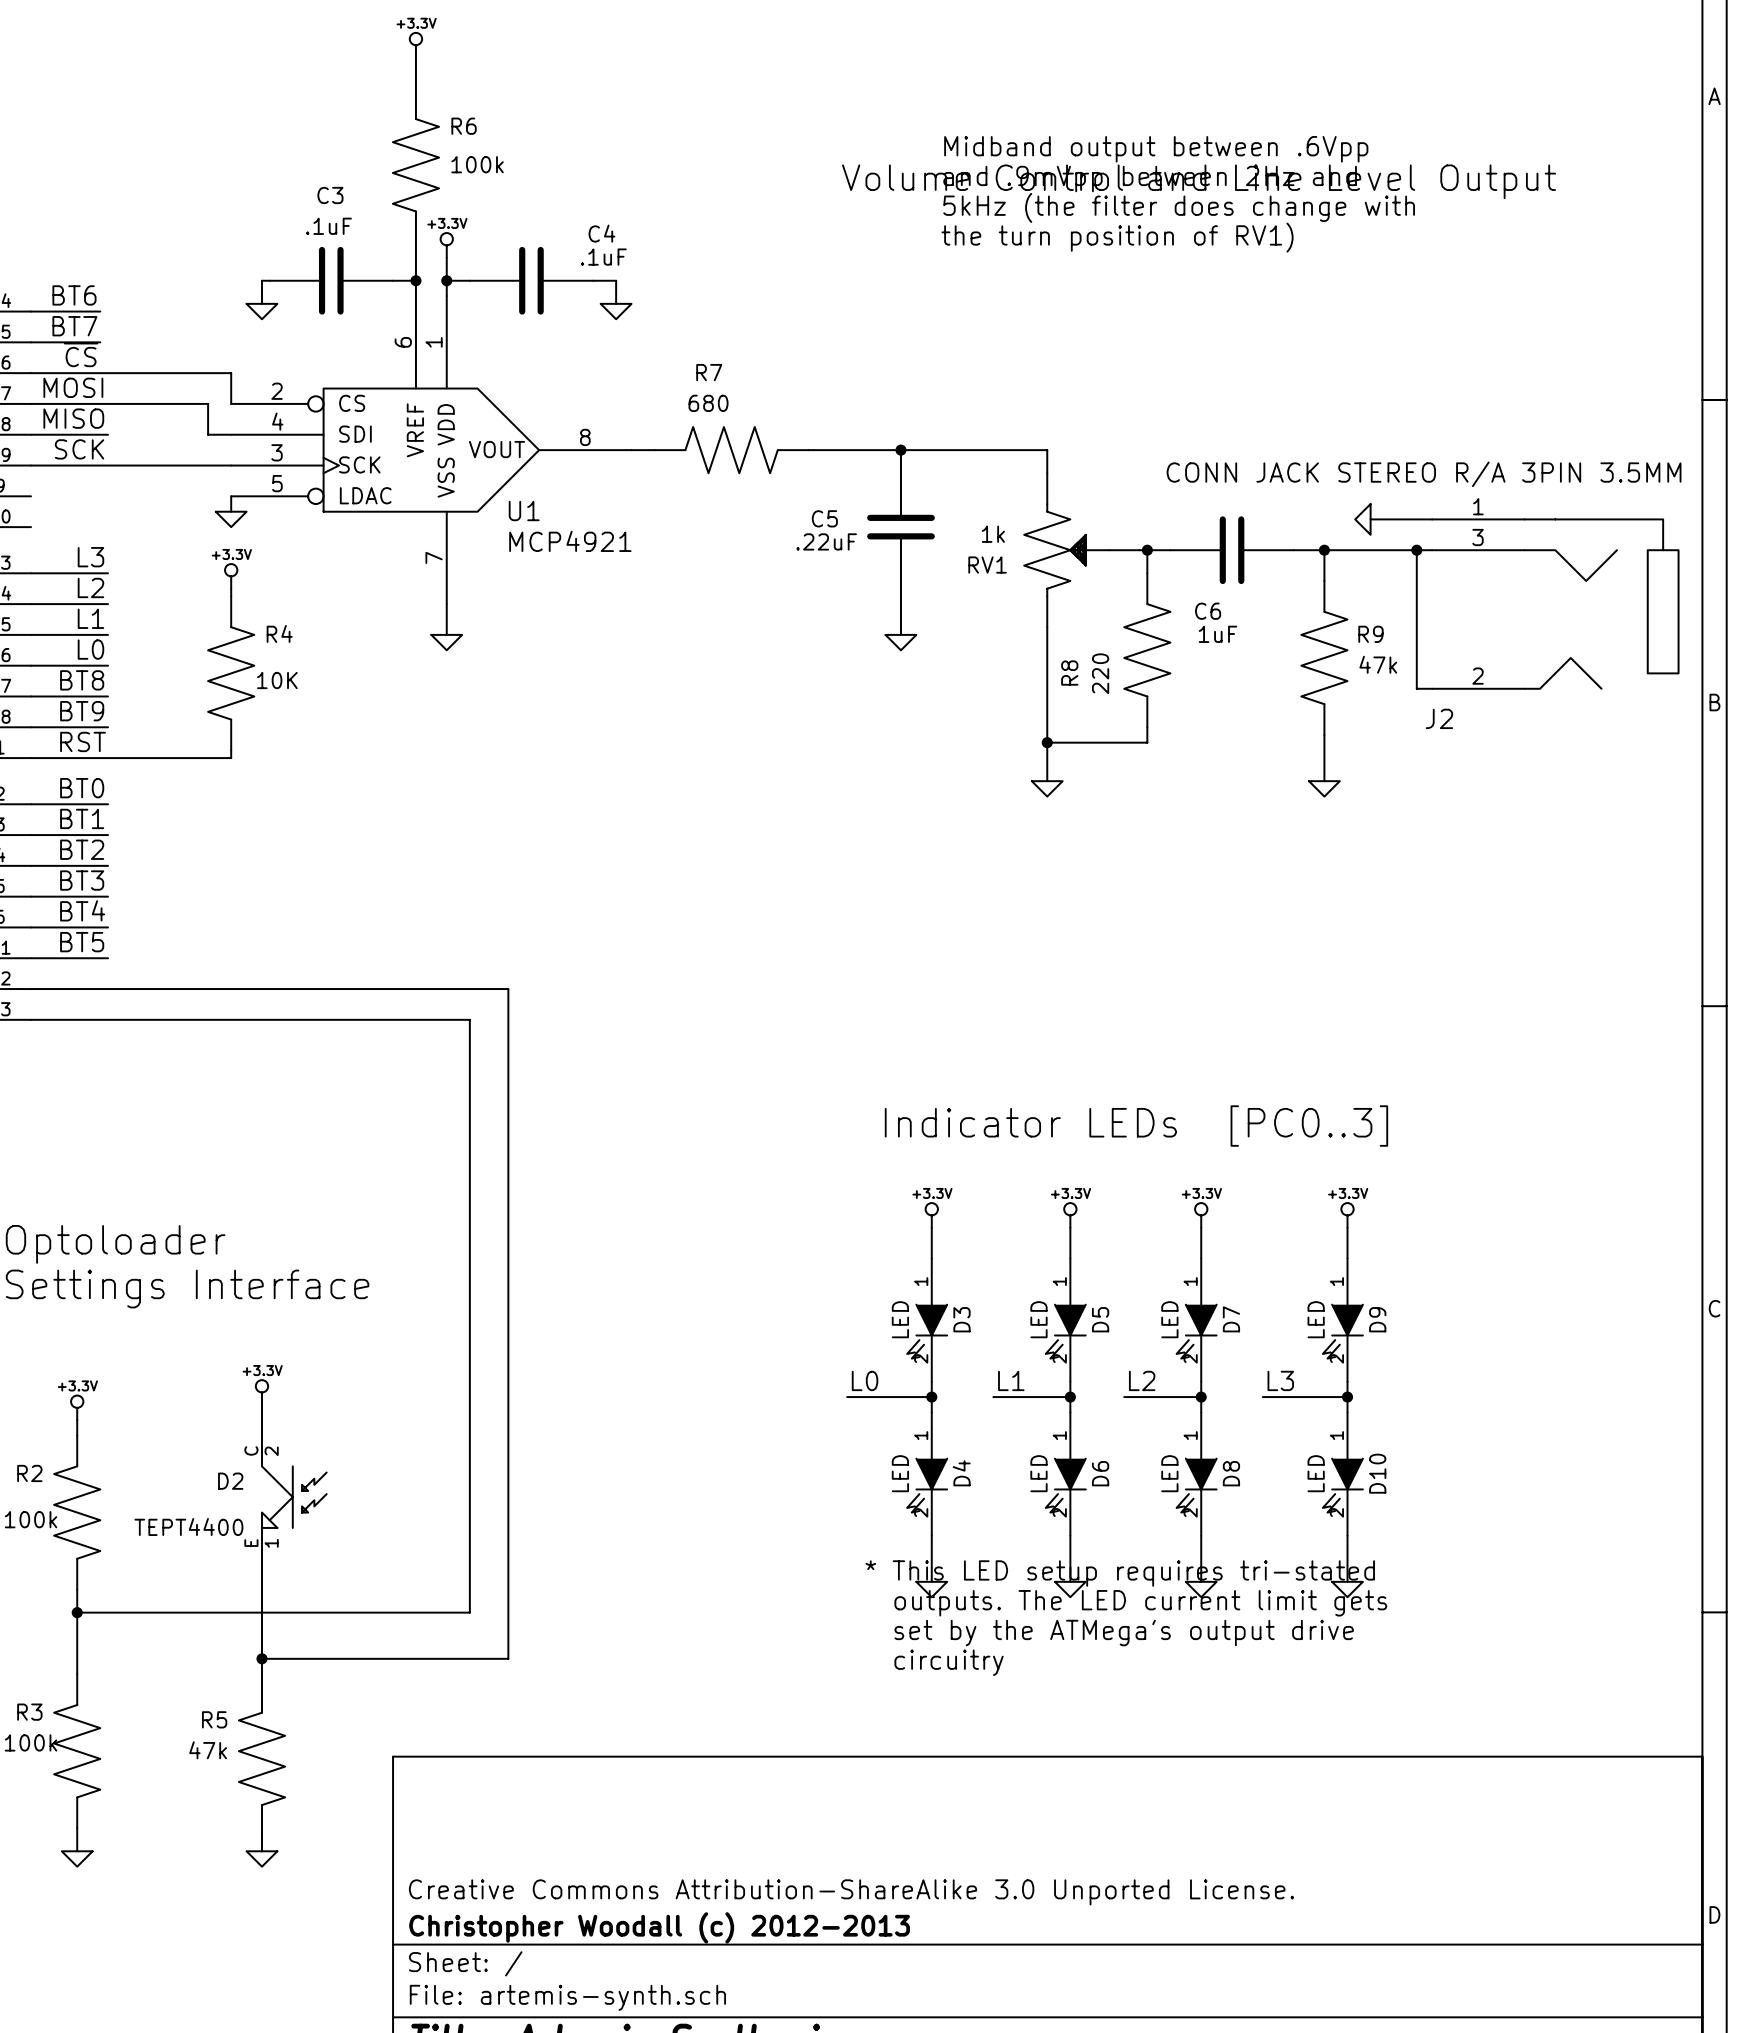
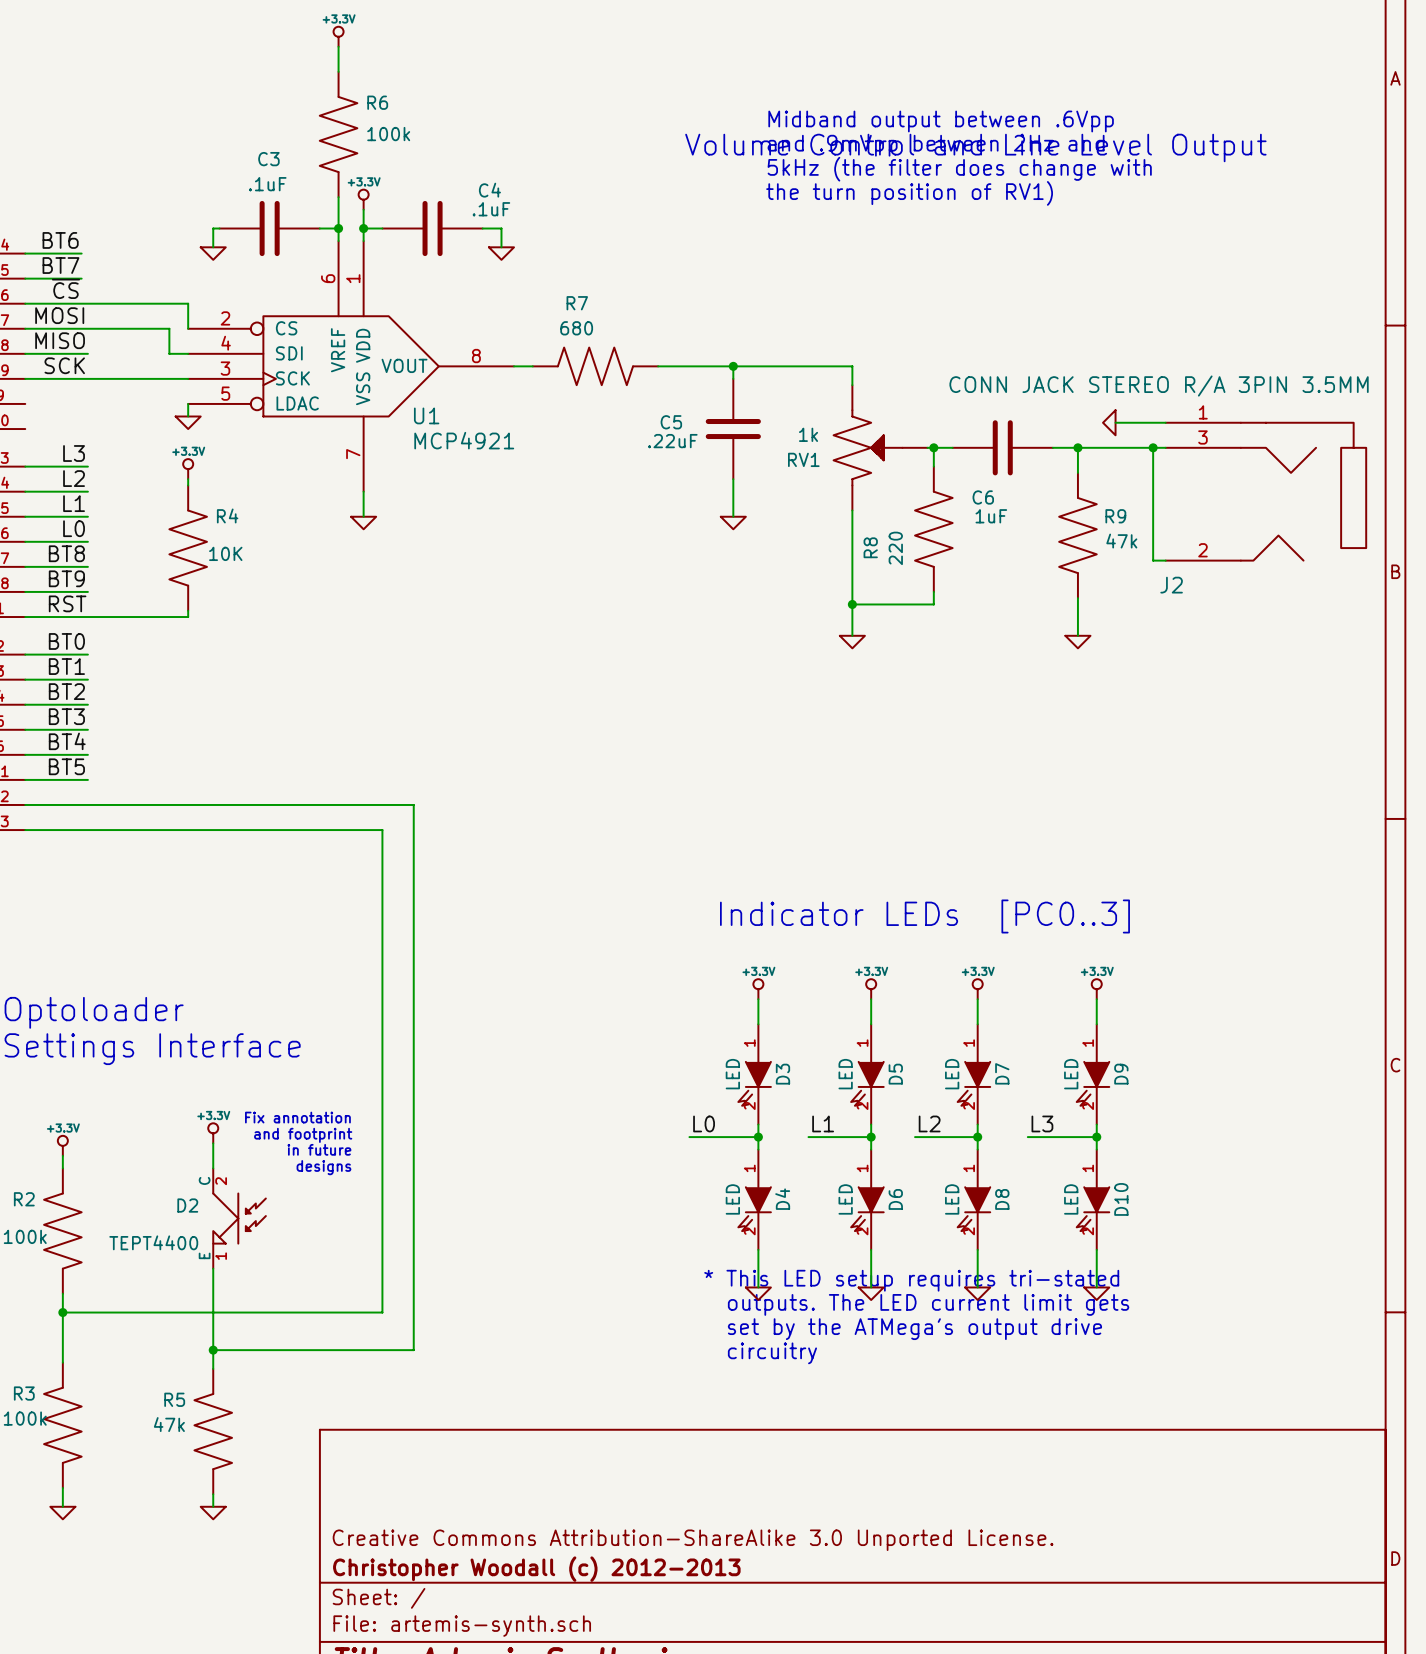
text: none -> Fix annotation (297, 1117)
text: none -> and footprint (303, 1135)
text: none -> in future (319, 1149)
text: none -> designs (323, 1167)

